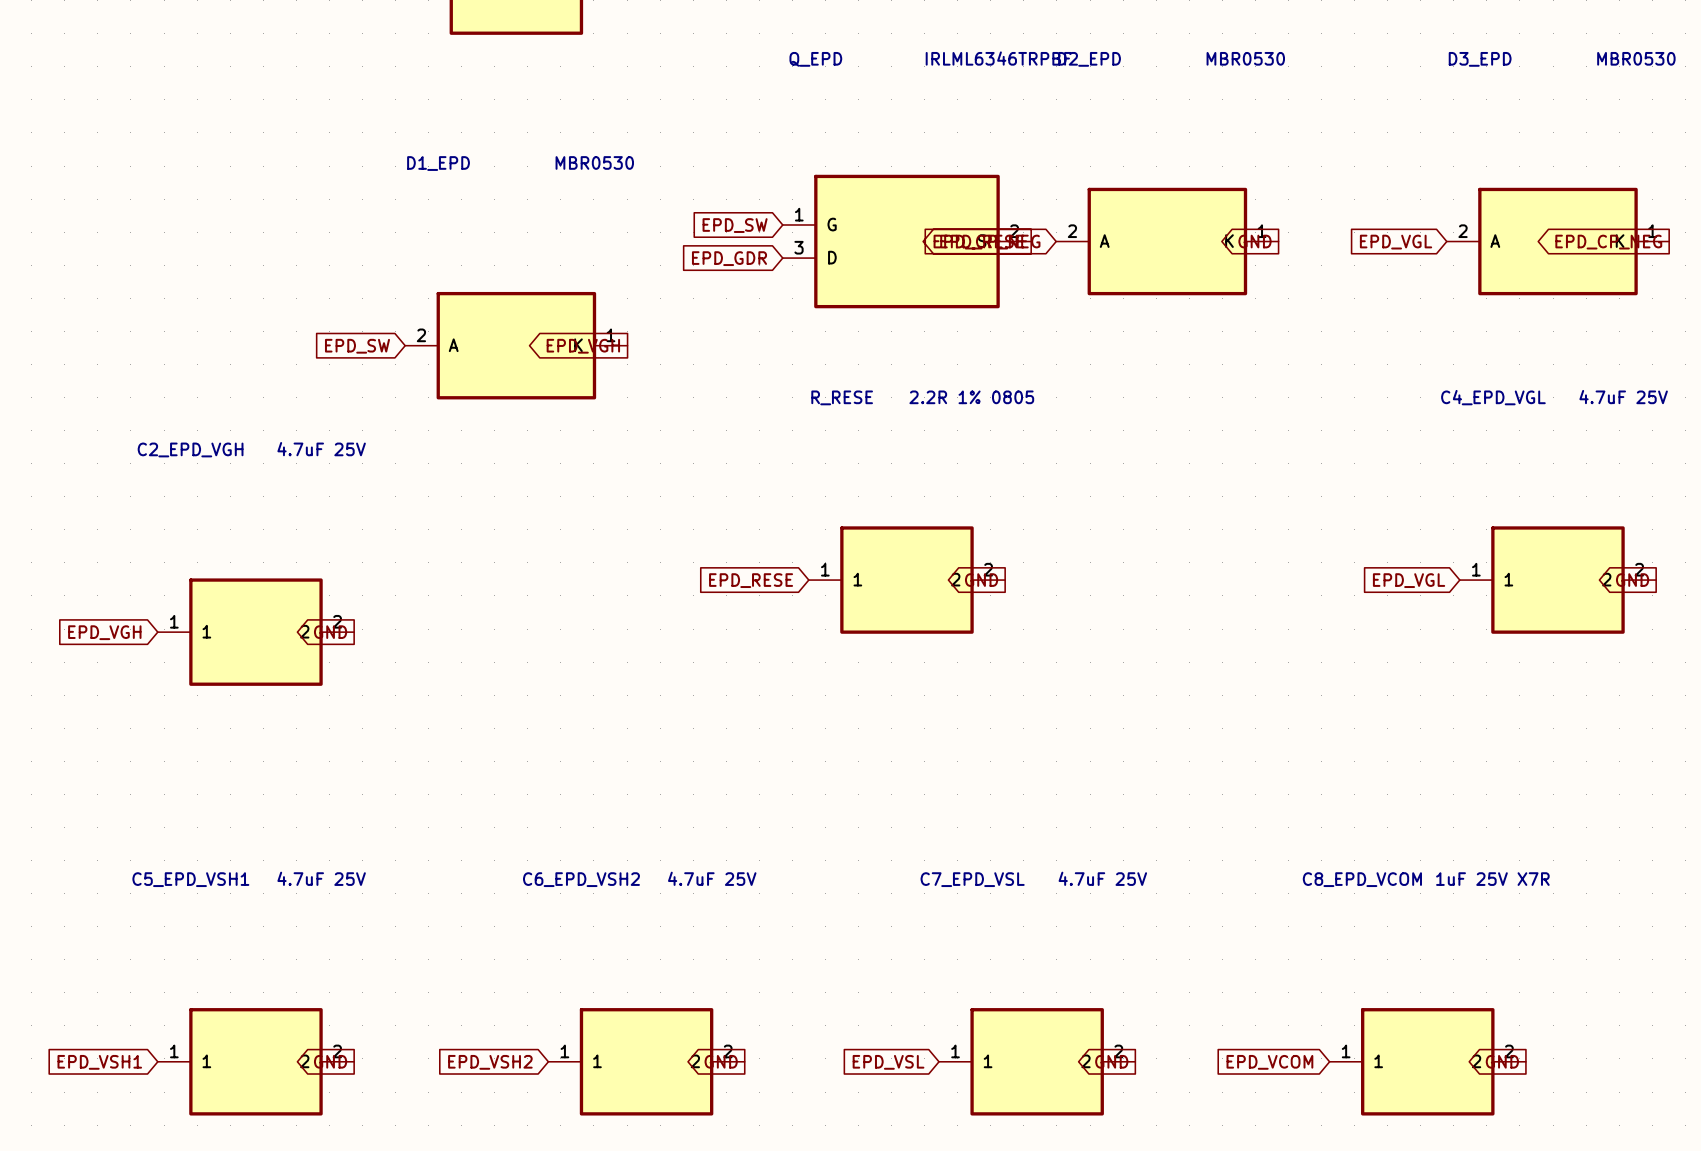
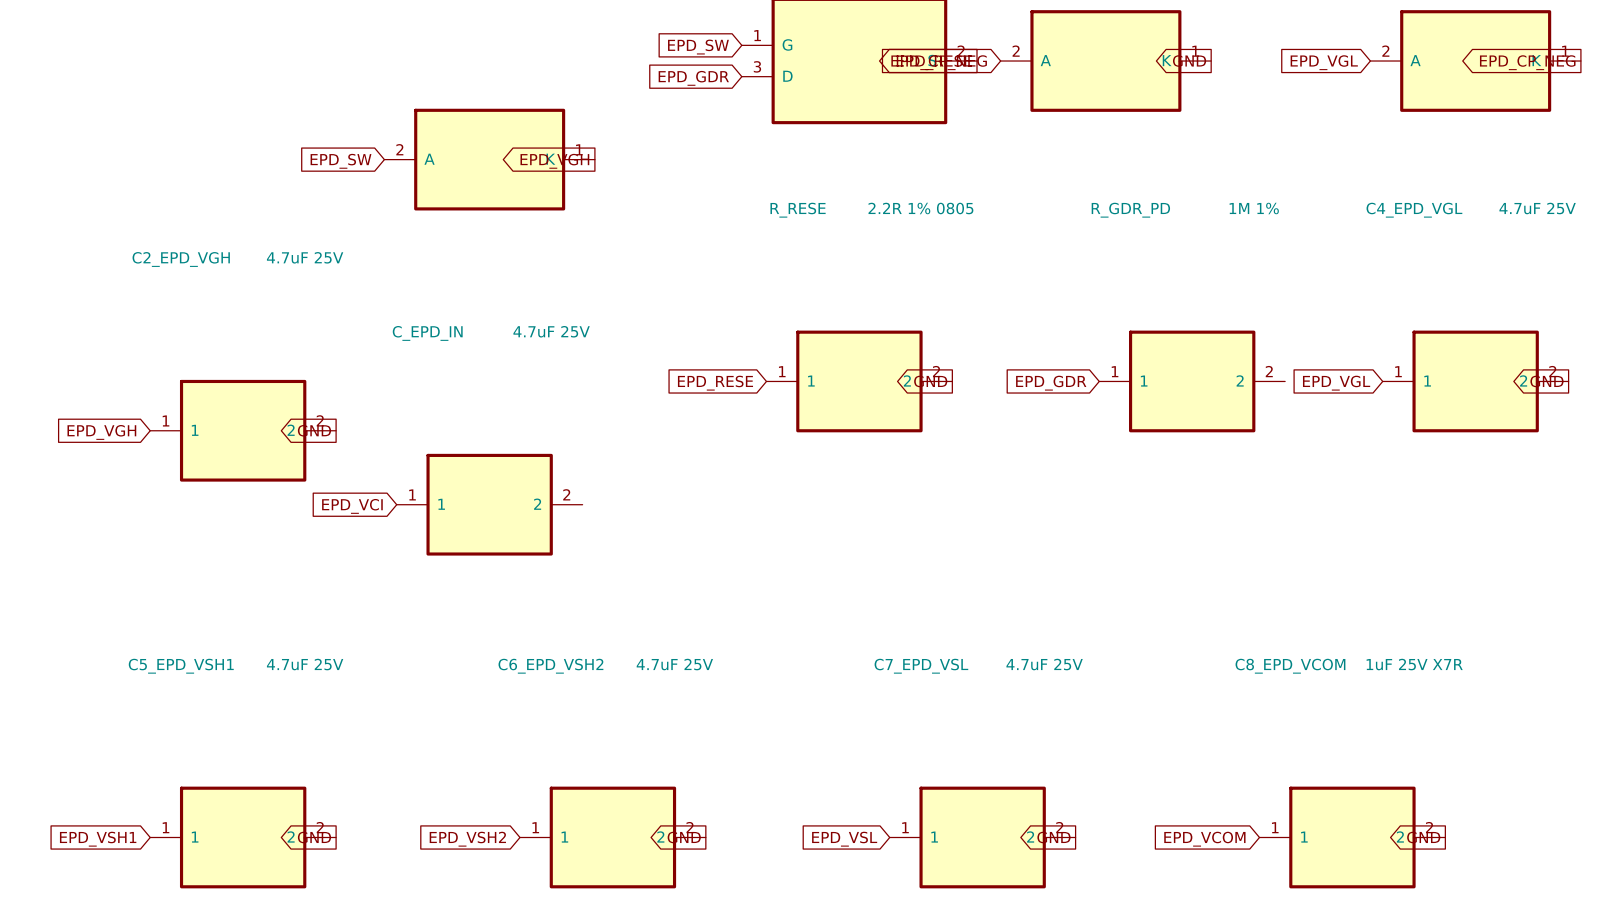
global label: none -> EPD_GDR (1051, 383)
R_GDR_PD: none -> 1M 1% (1192, 381)
global label: none -> EPD_VCI (352, 506)
C_EPD_IN: none -> 4.7uF 25V (489, 504)

